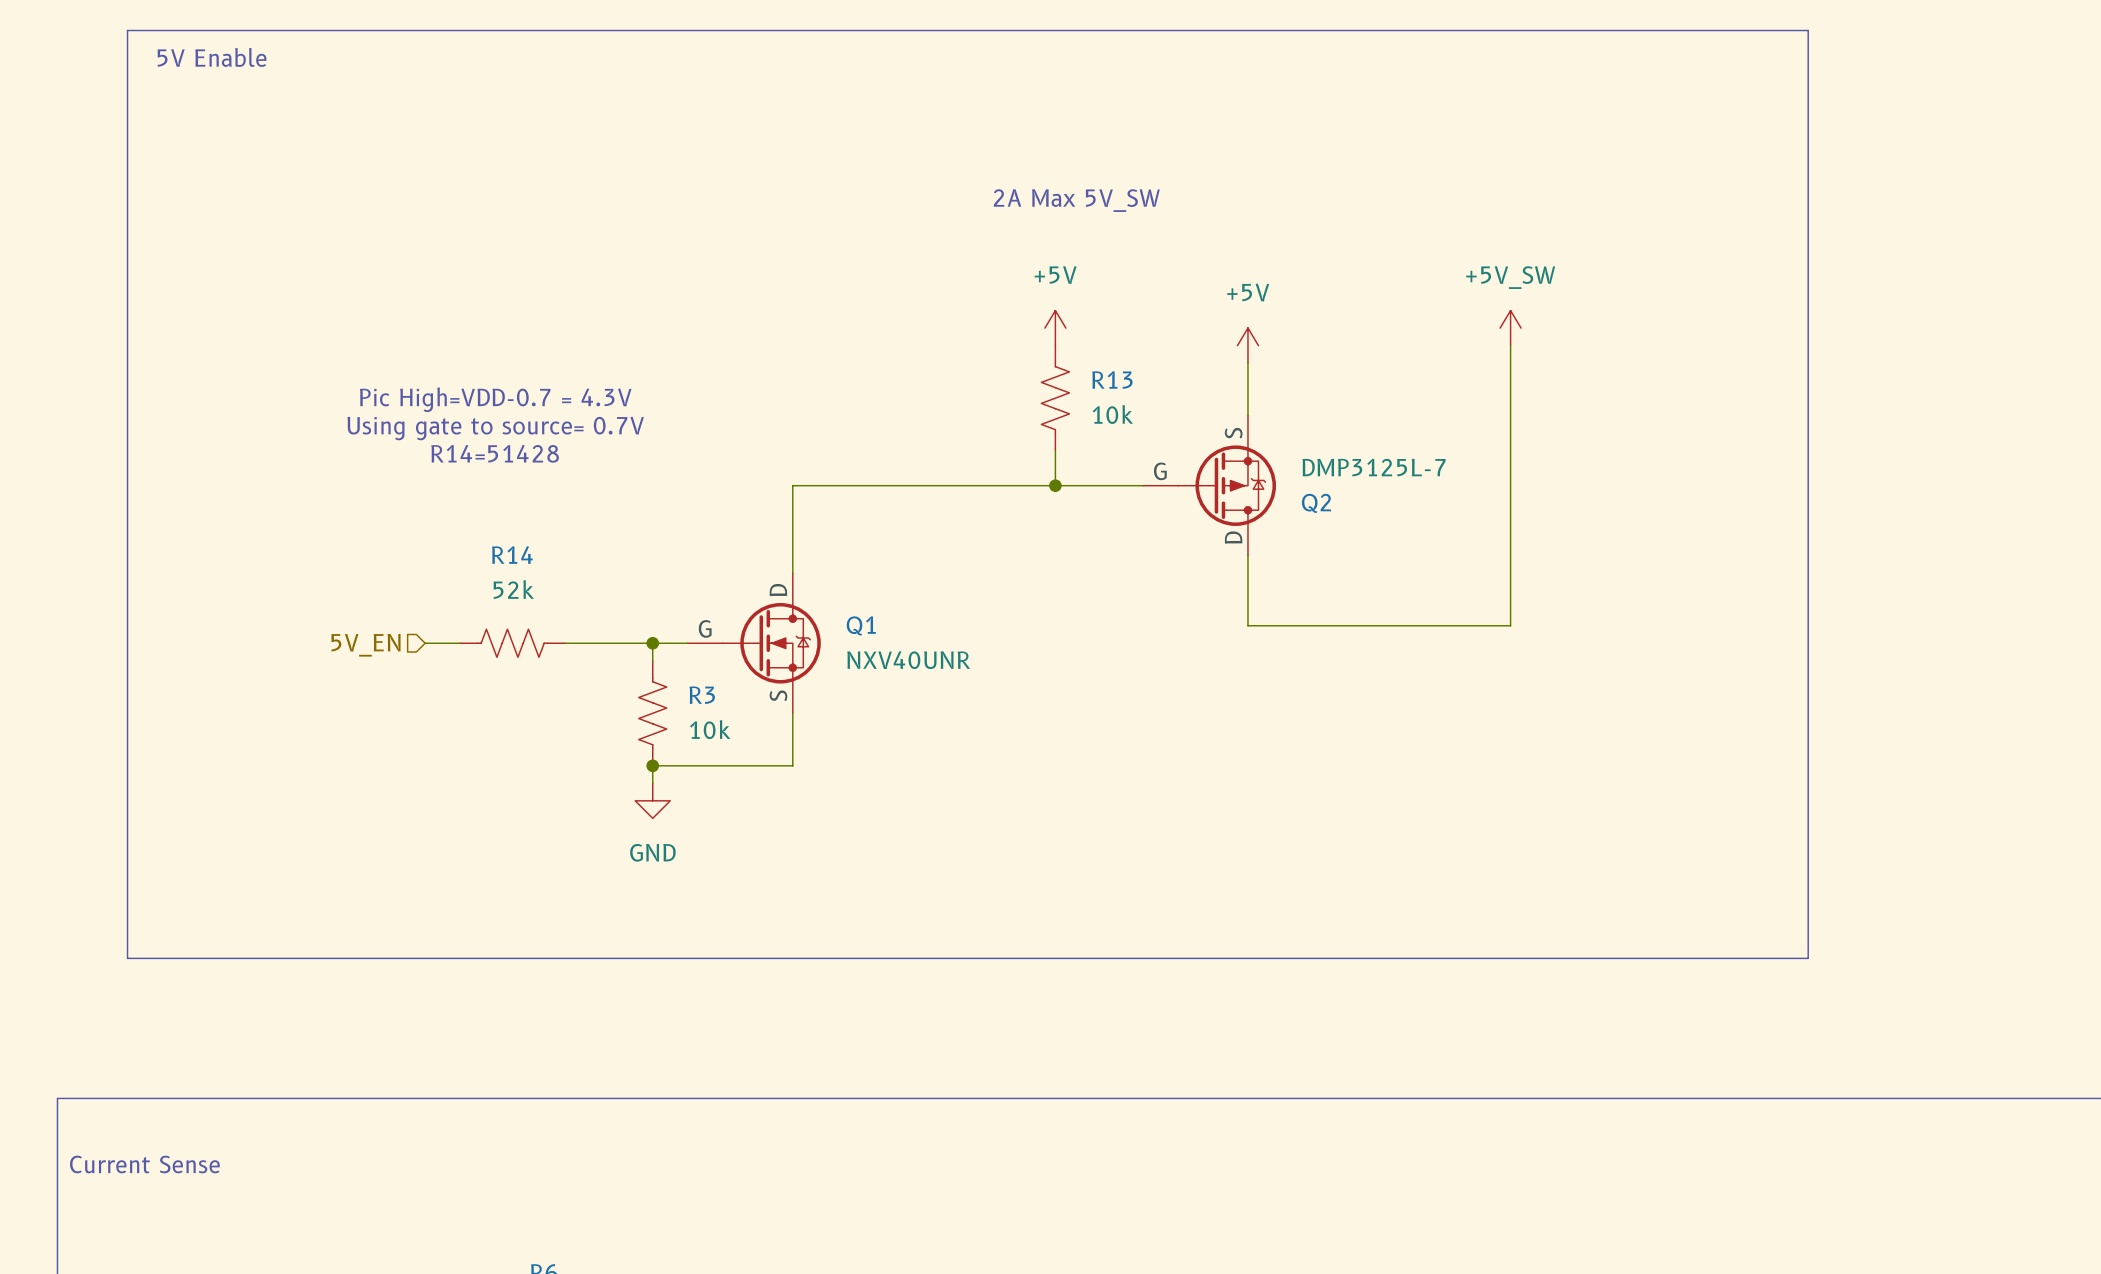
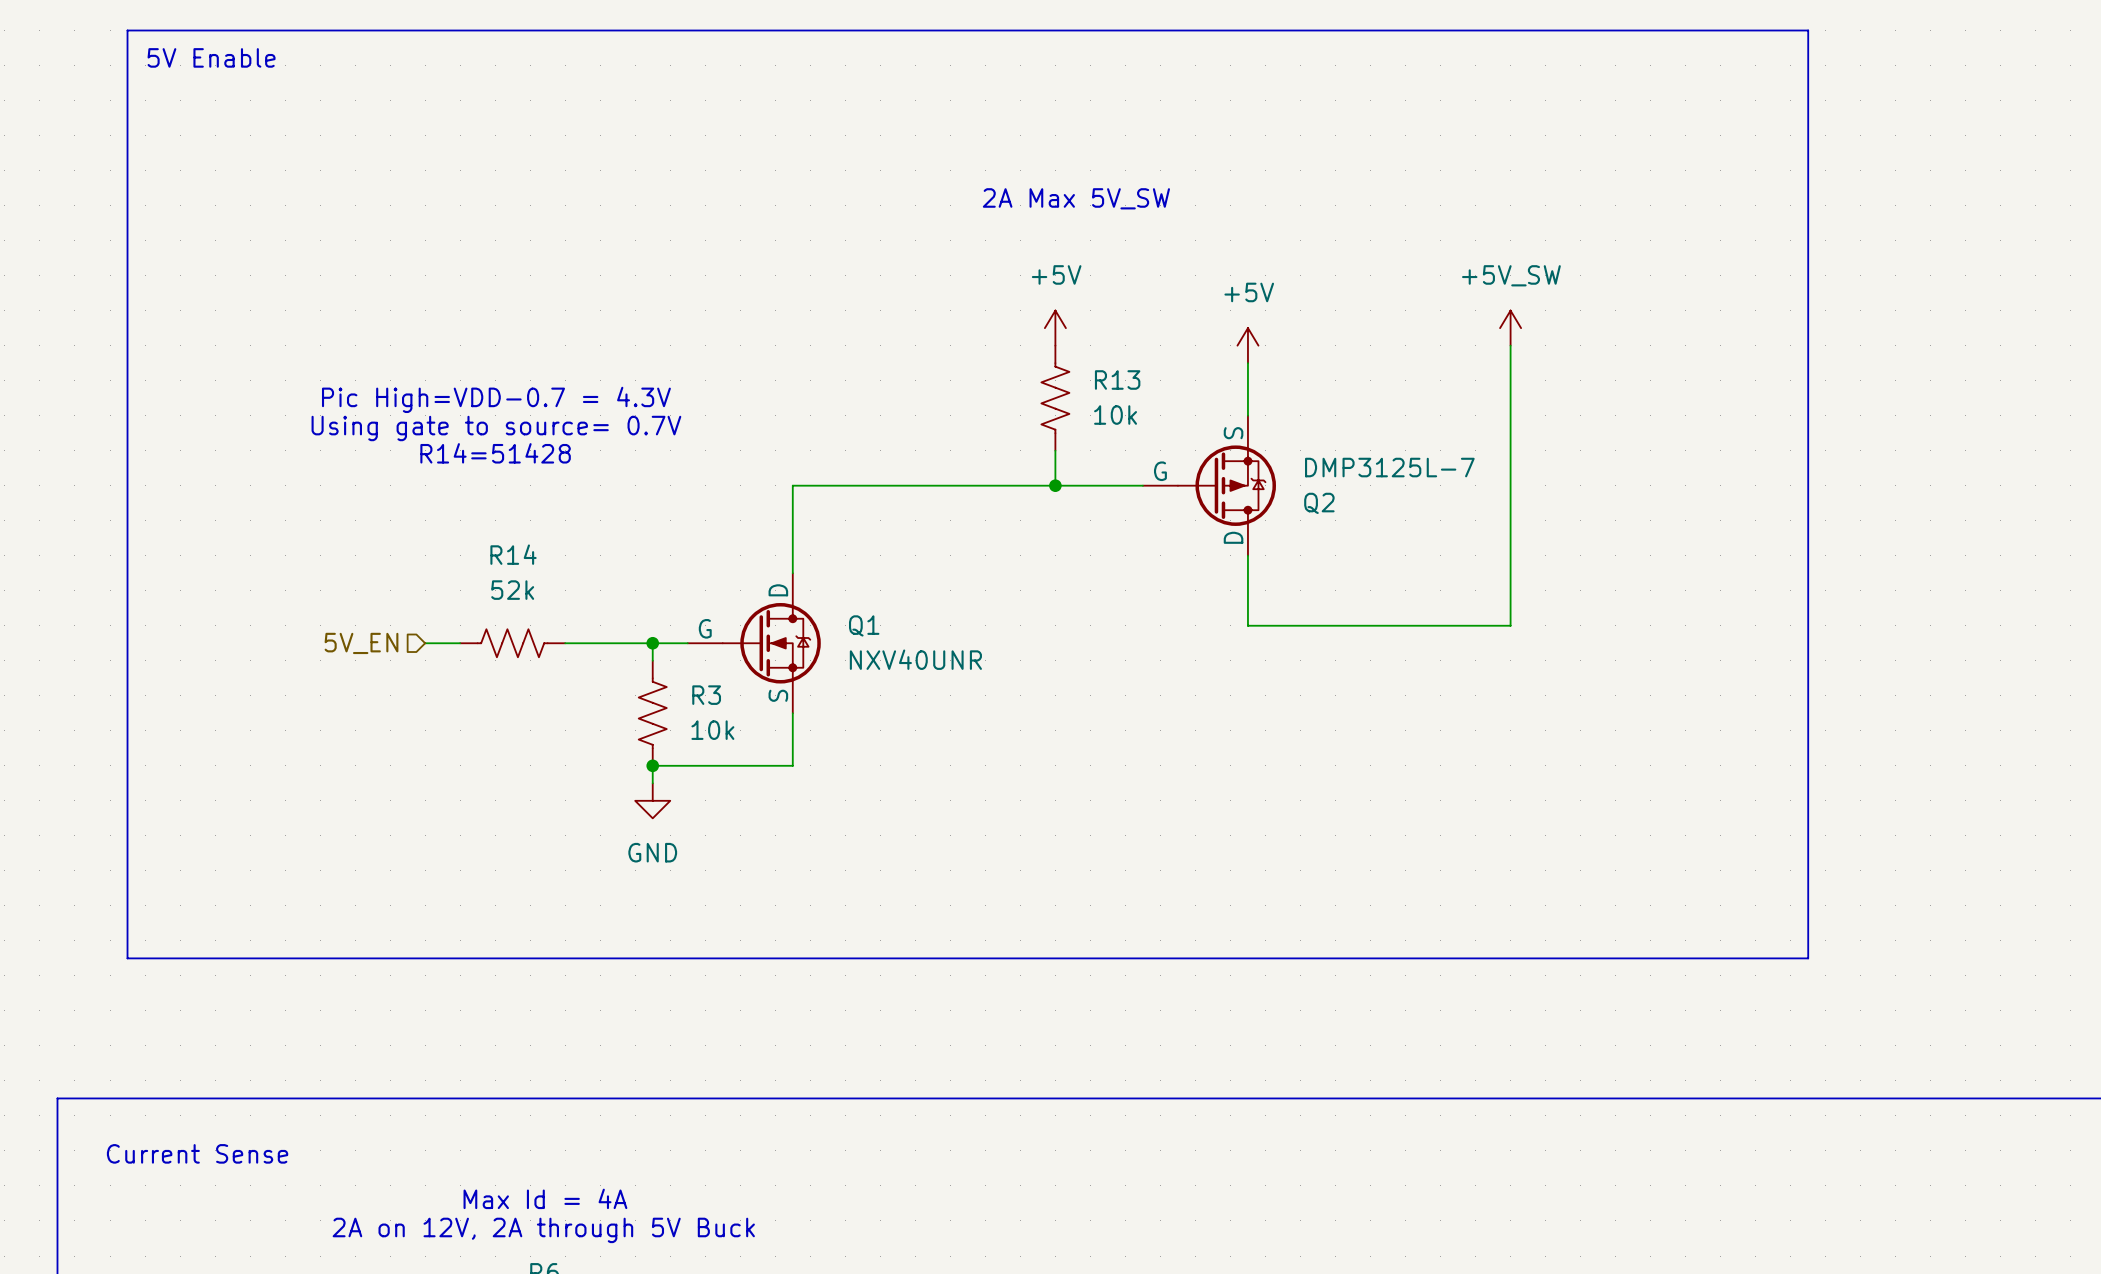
text position: Current Sense (144, 1164) -> Current Sense (197, 1153)
text: none -> Max Id = 4A (545, 1198)
text: none -> 2A on 12V, 2A through 5V Buck (543, 1230)

